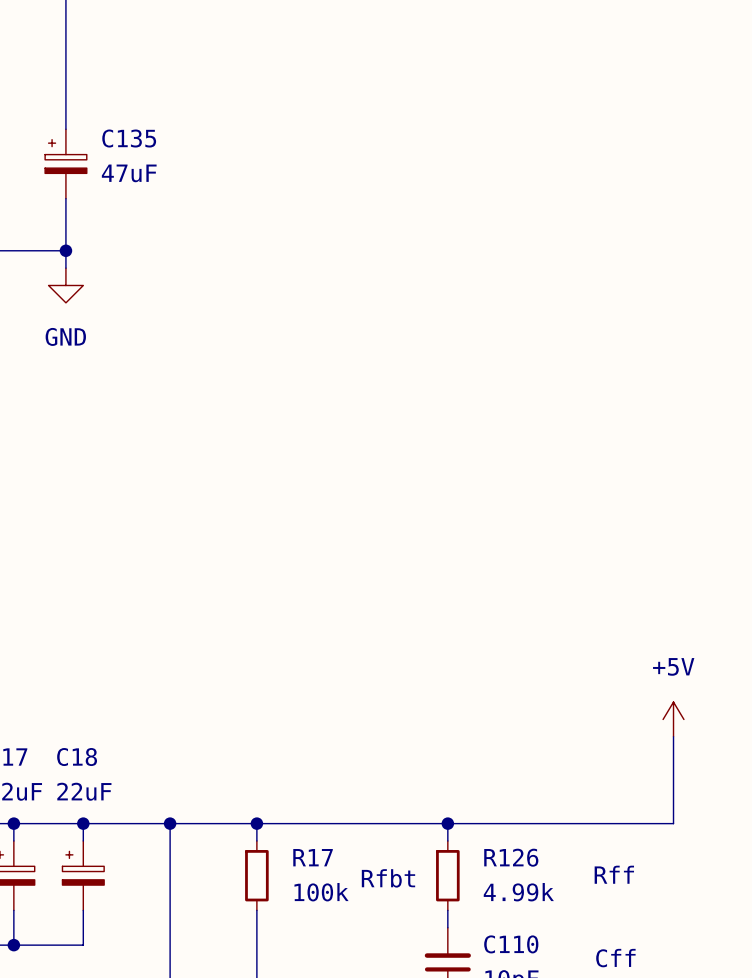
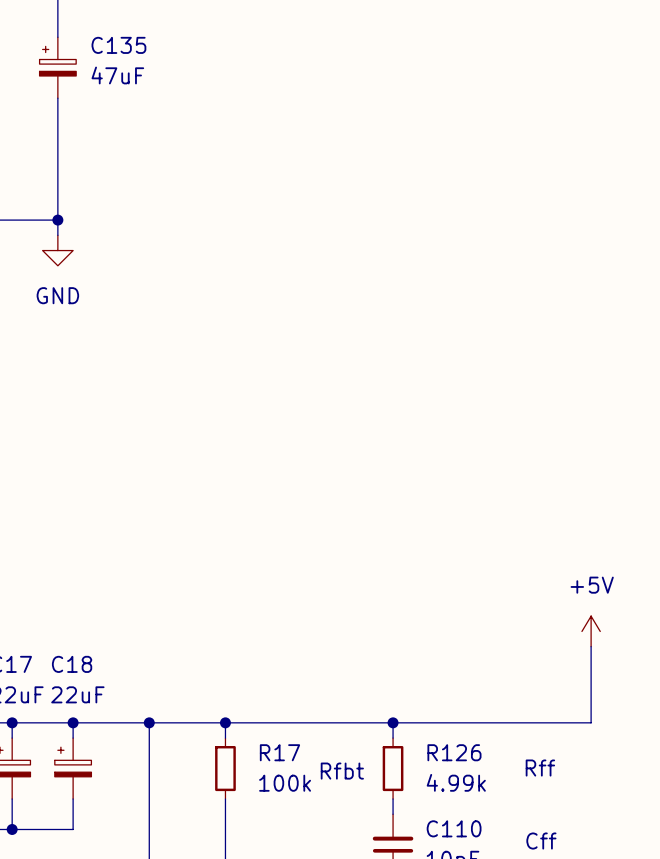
C135 position: (65, 163) -> (57, 67)

